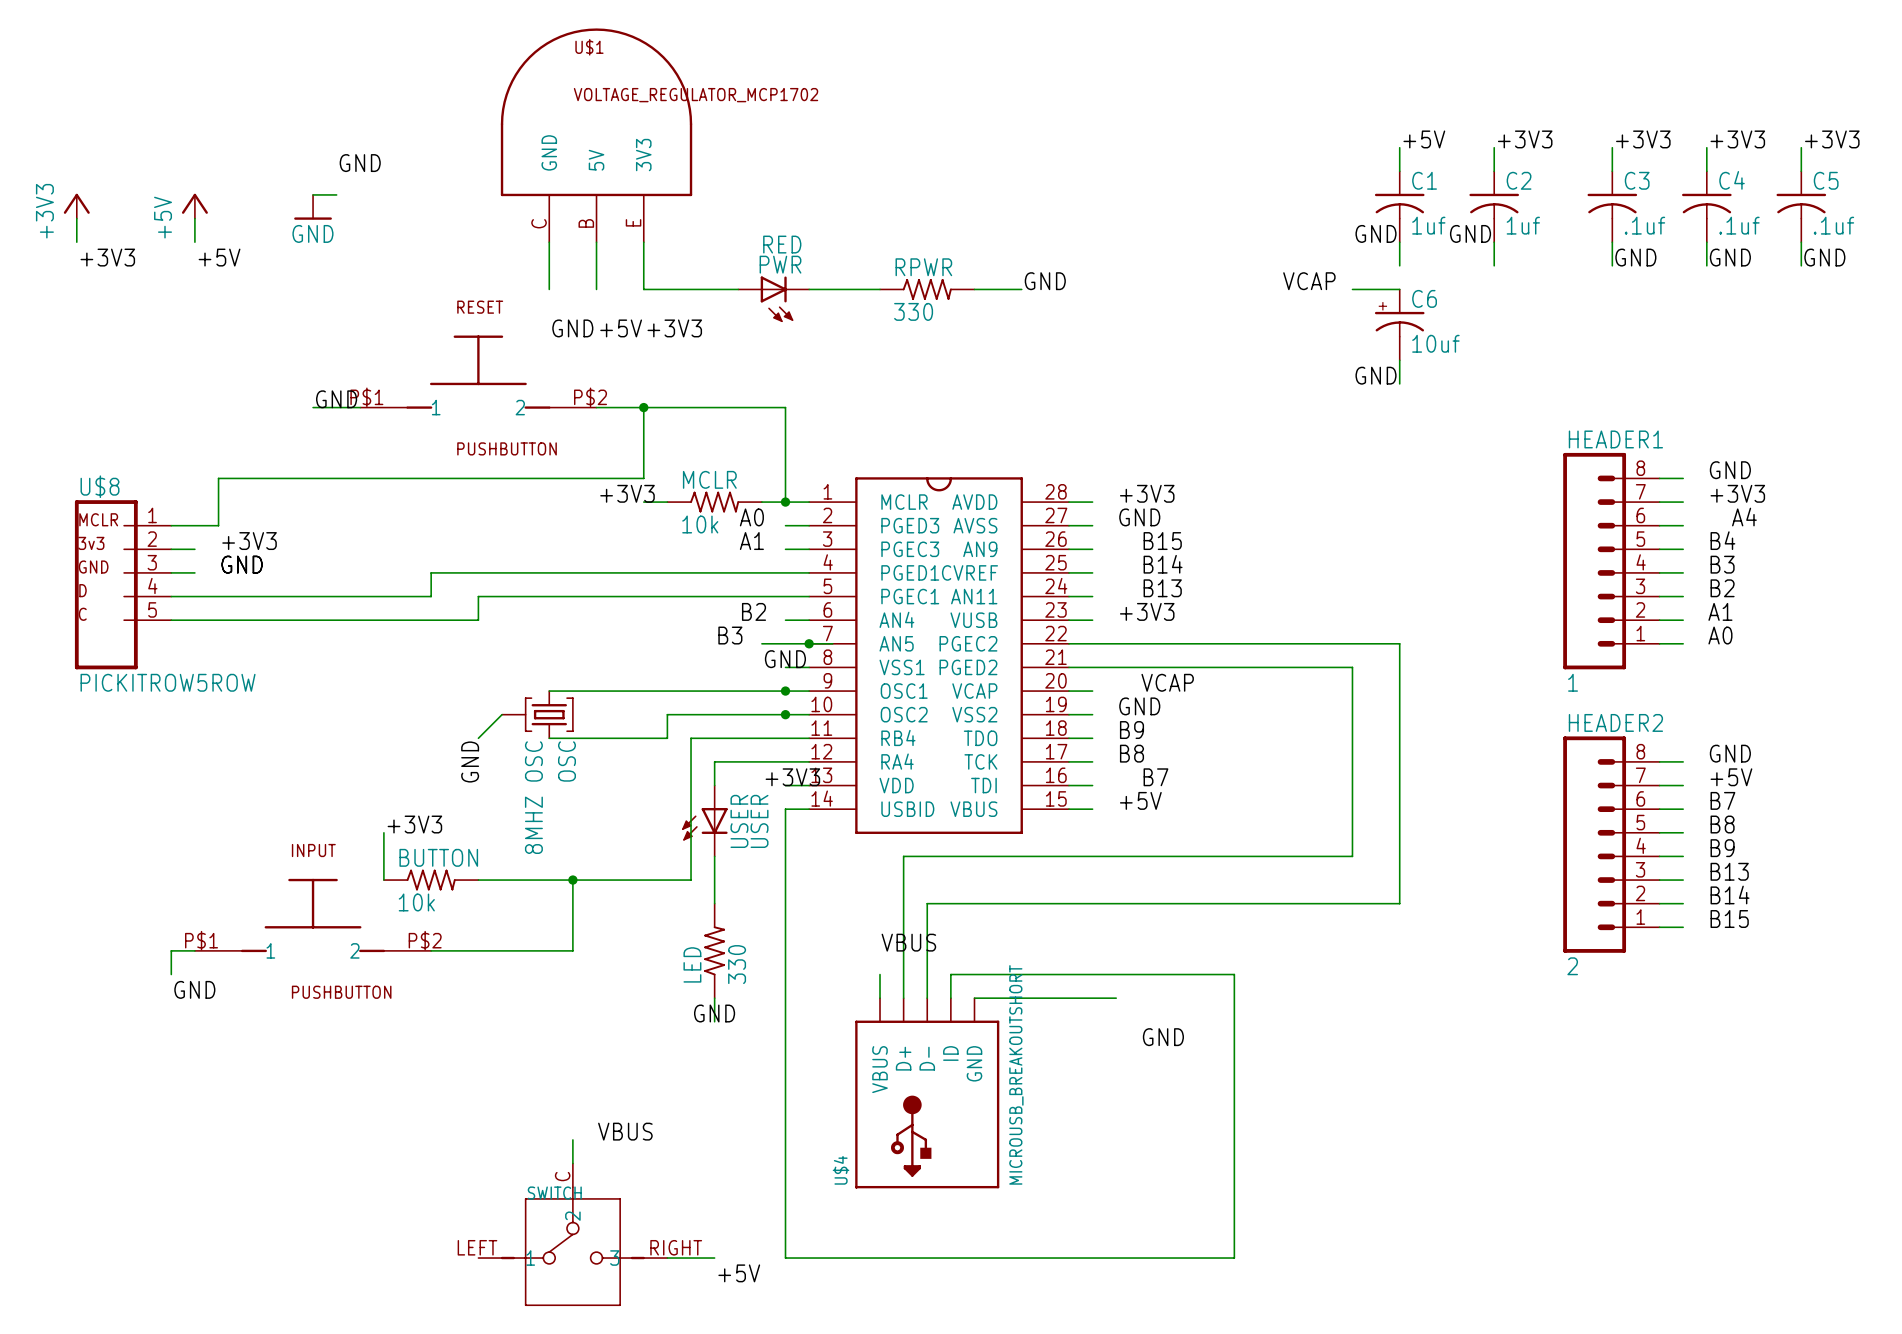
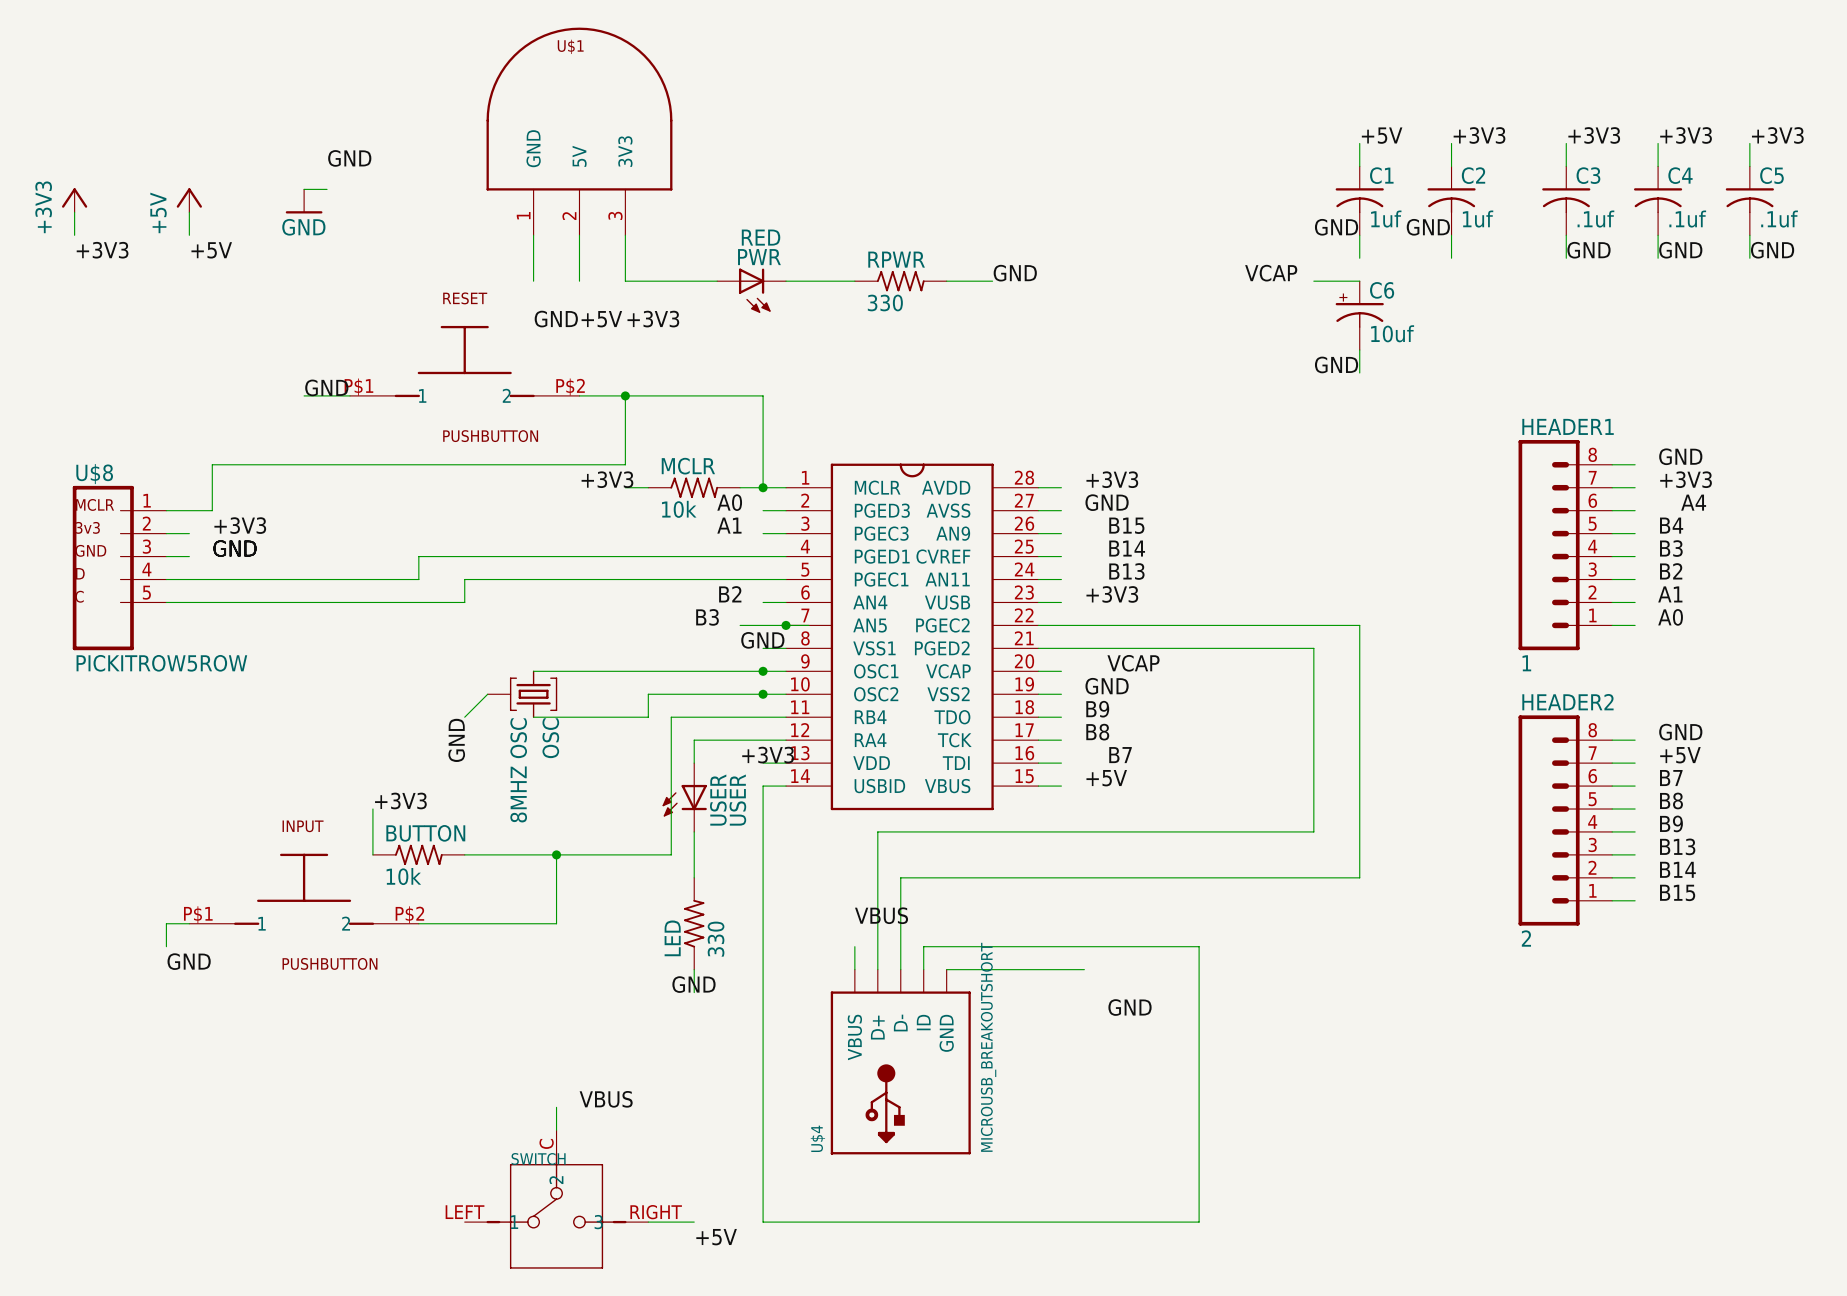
U$1 value: VOLTAGE_REGULATOR_MCP1702 (696, 95) -> none
U$1 pin number: E (633, 222) -> 3 (615, 215)
U$1 pin number: C (539, 223) -> 1 (523, 215)
U$1 pin number: B (586, 223) -> 2 (569, 216)

